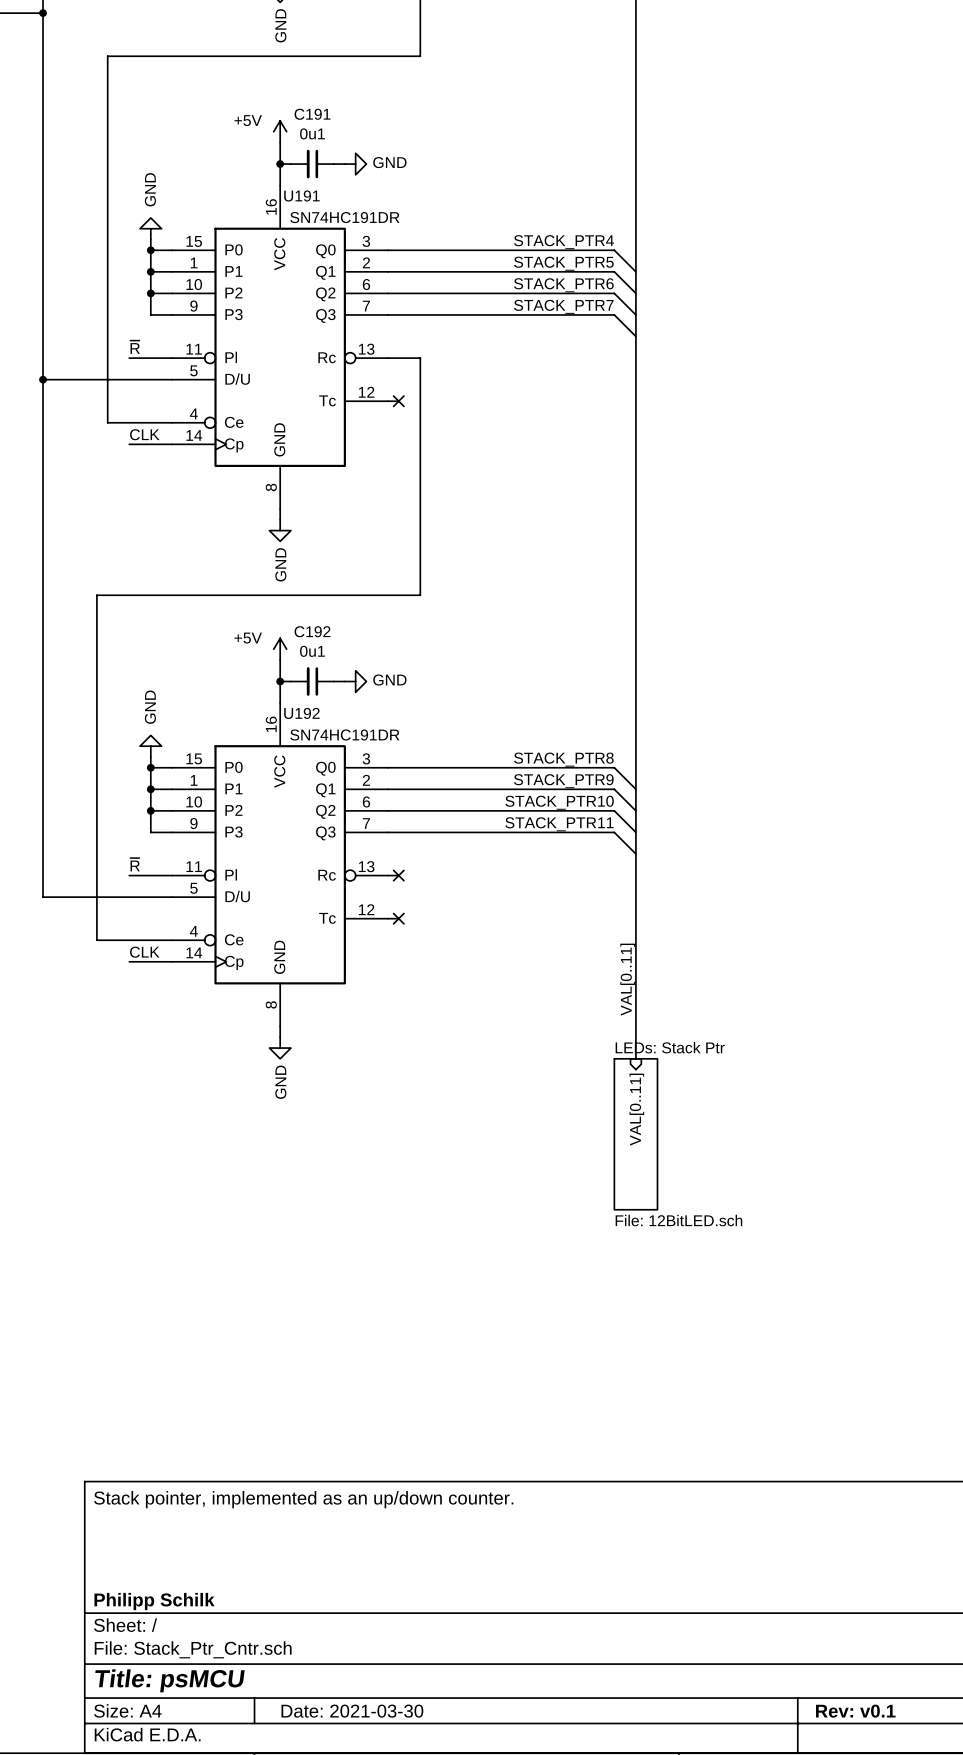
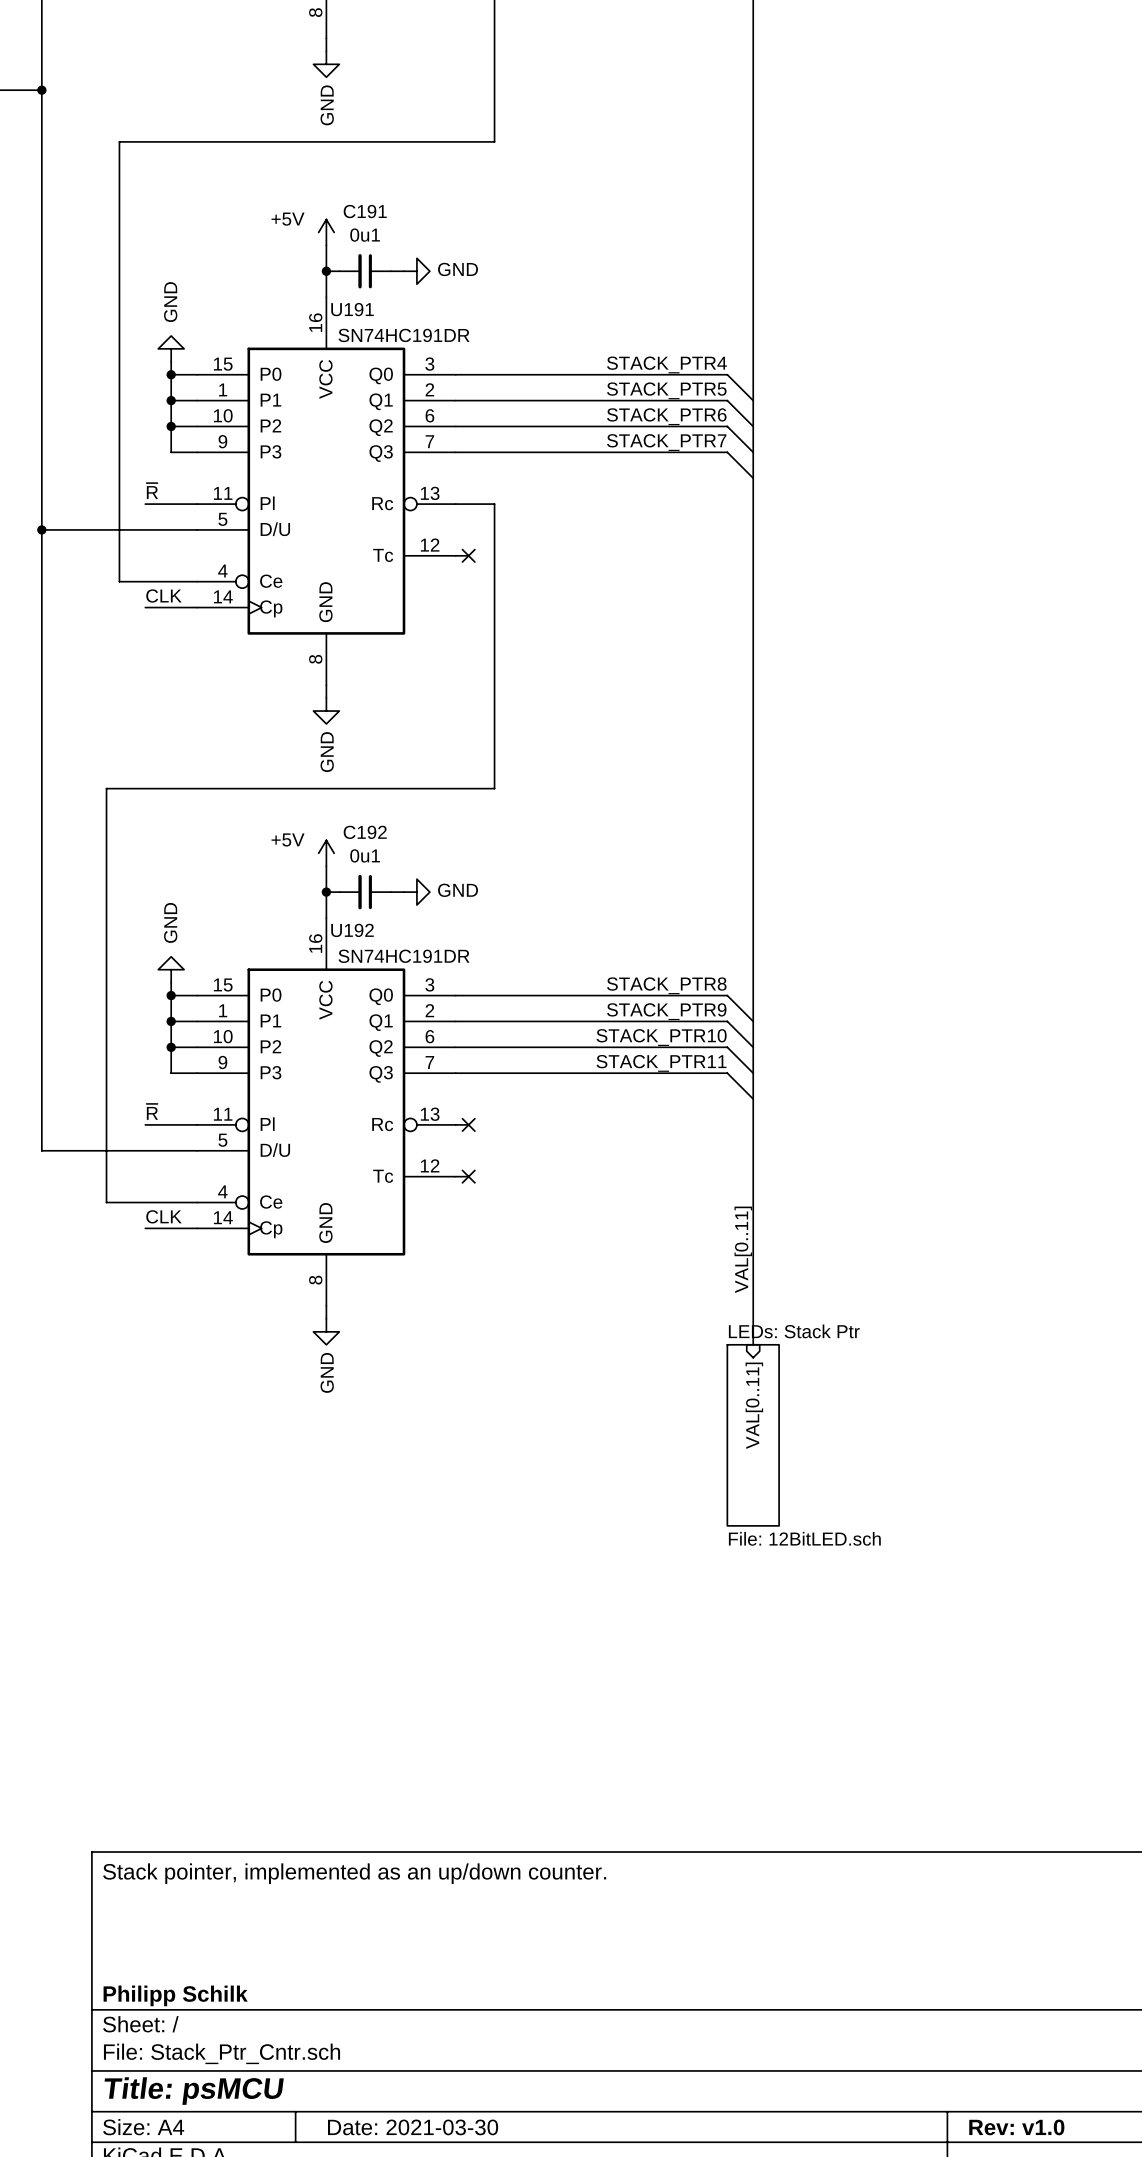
title block: Rev: v0.1 (855, 1711) -> Rev: v1.0 (1016, 2127)

